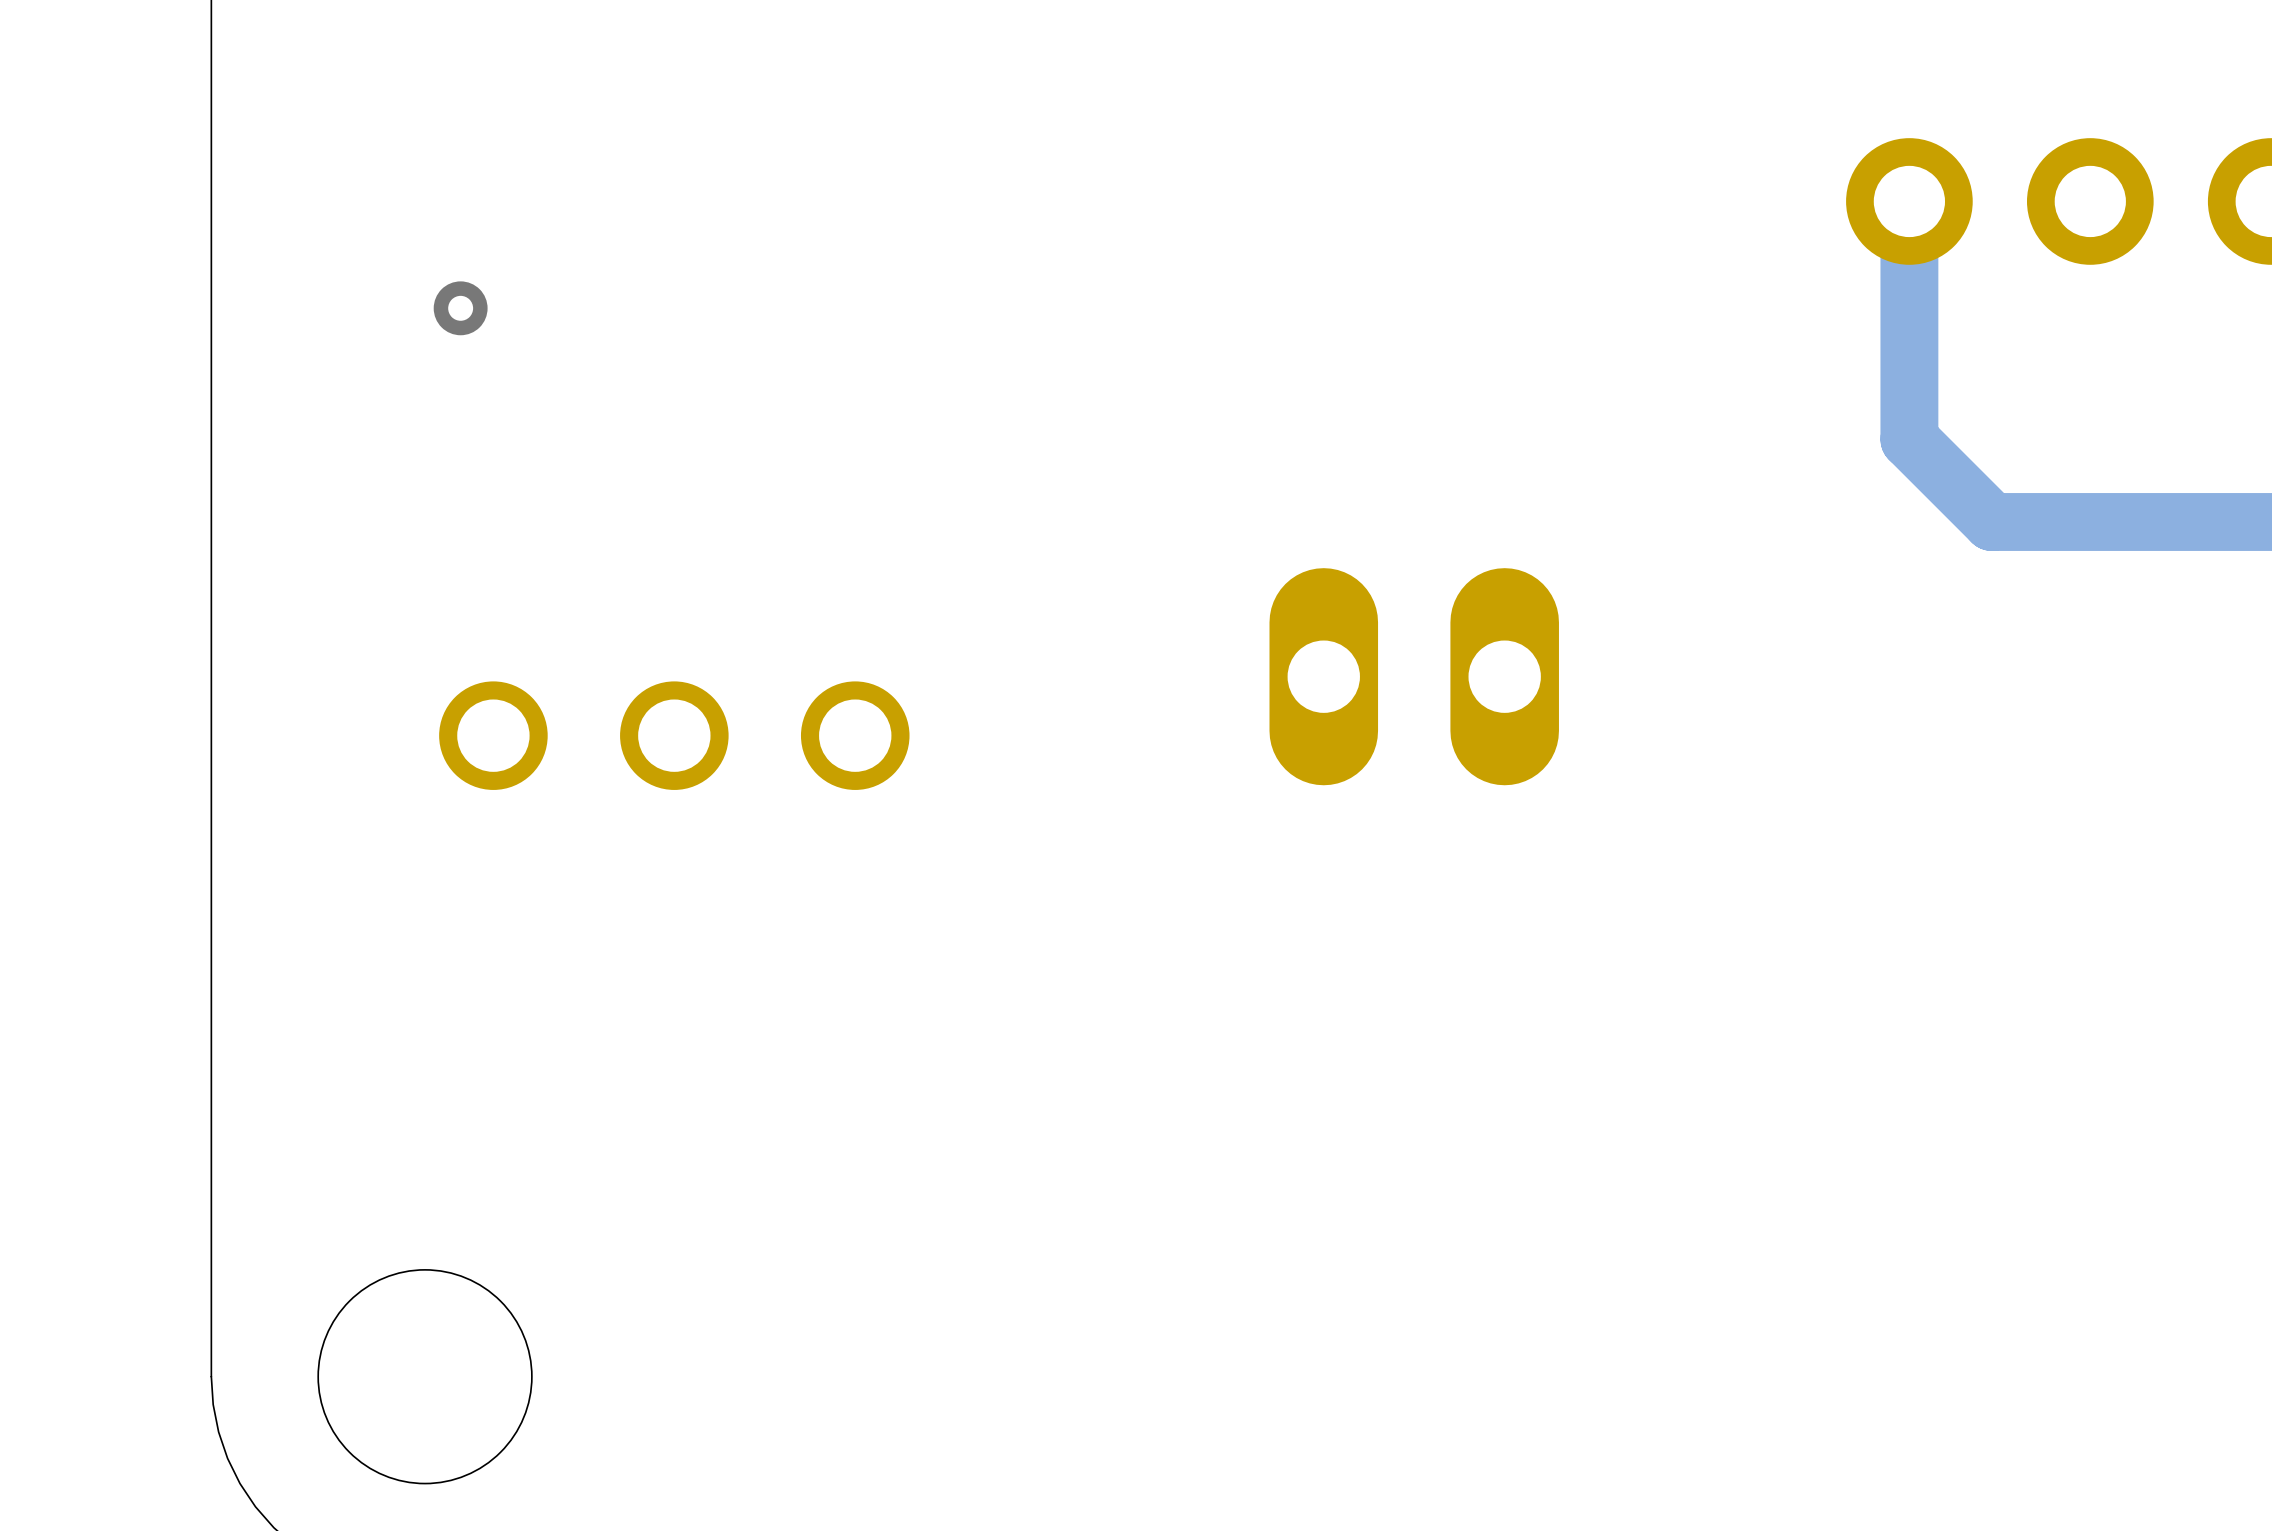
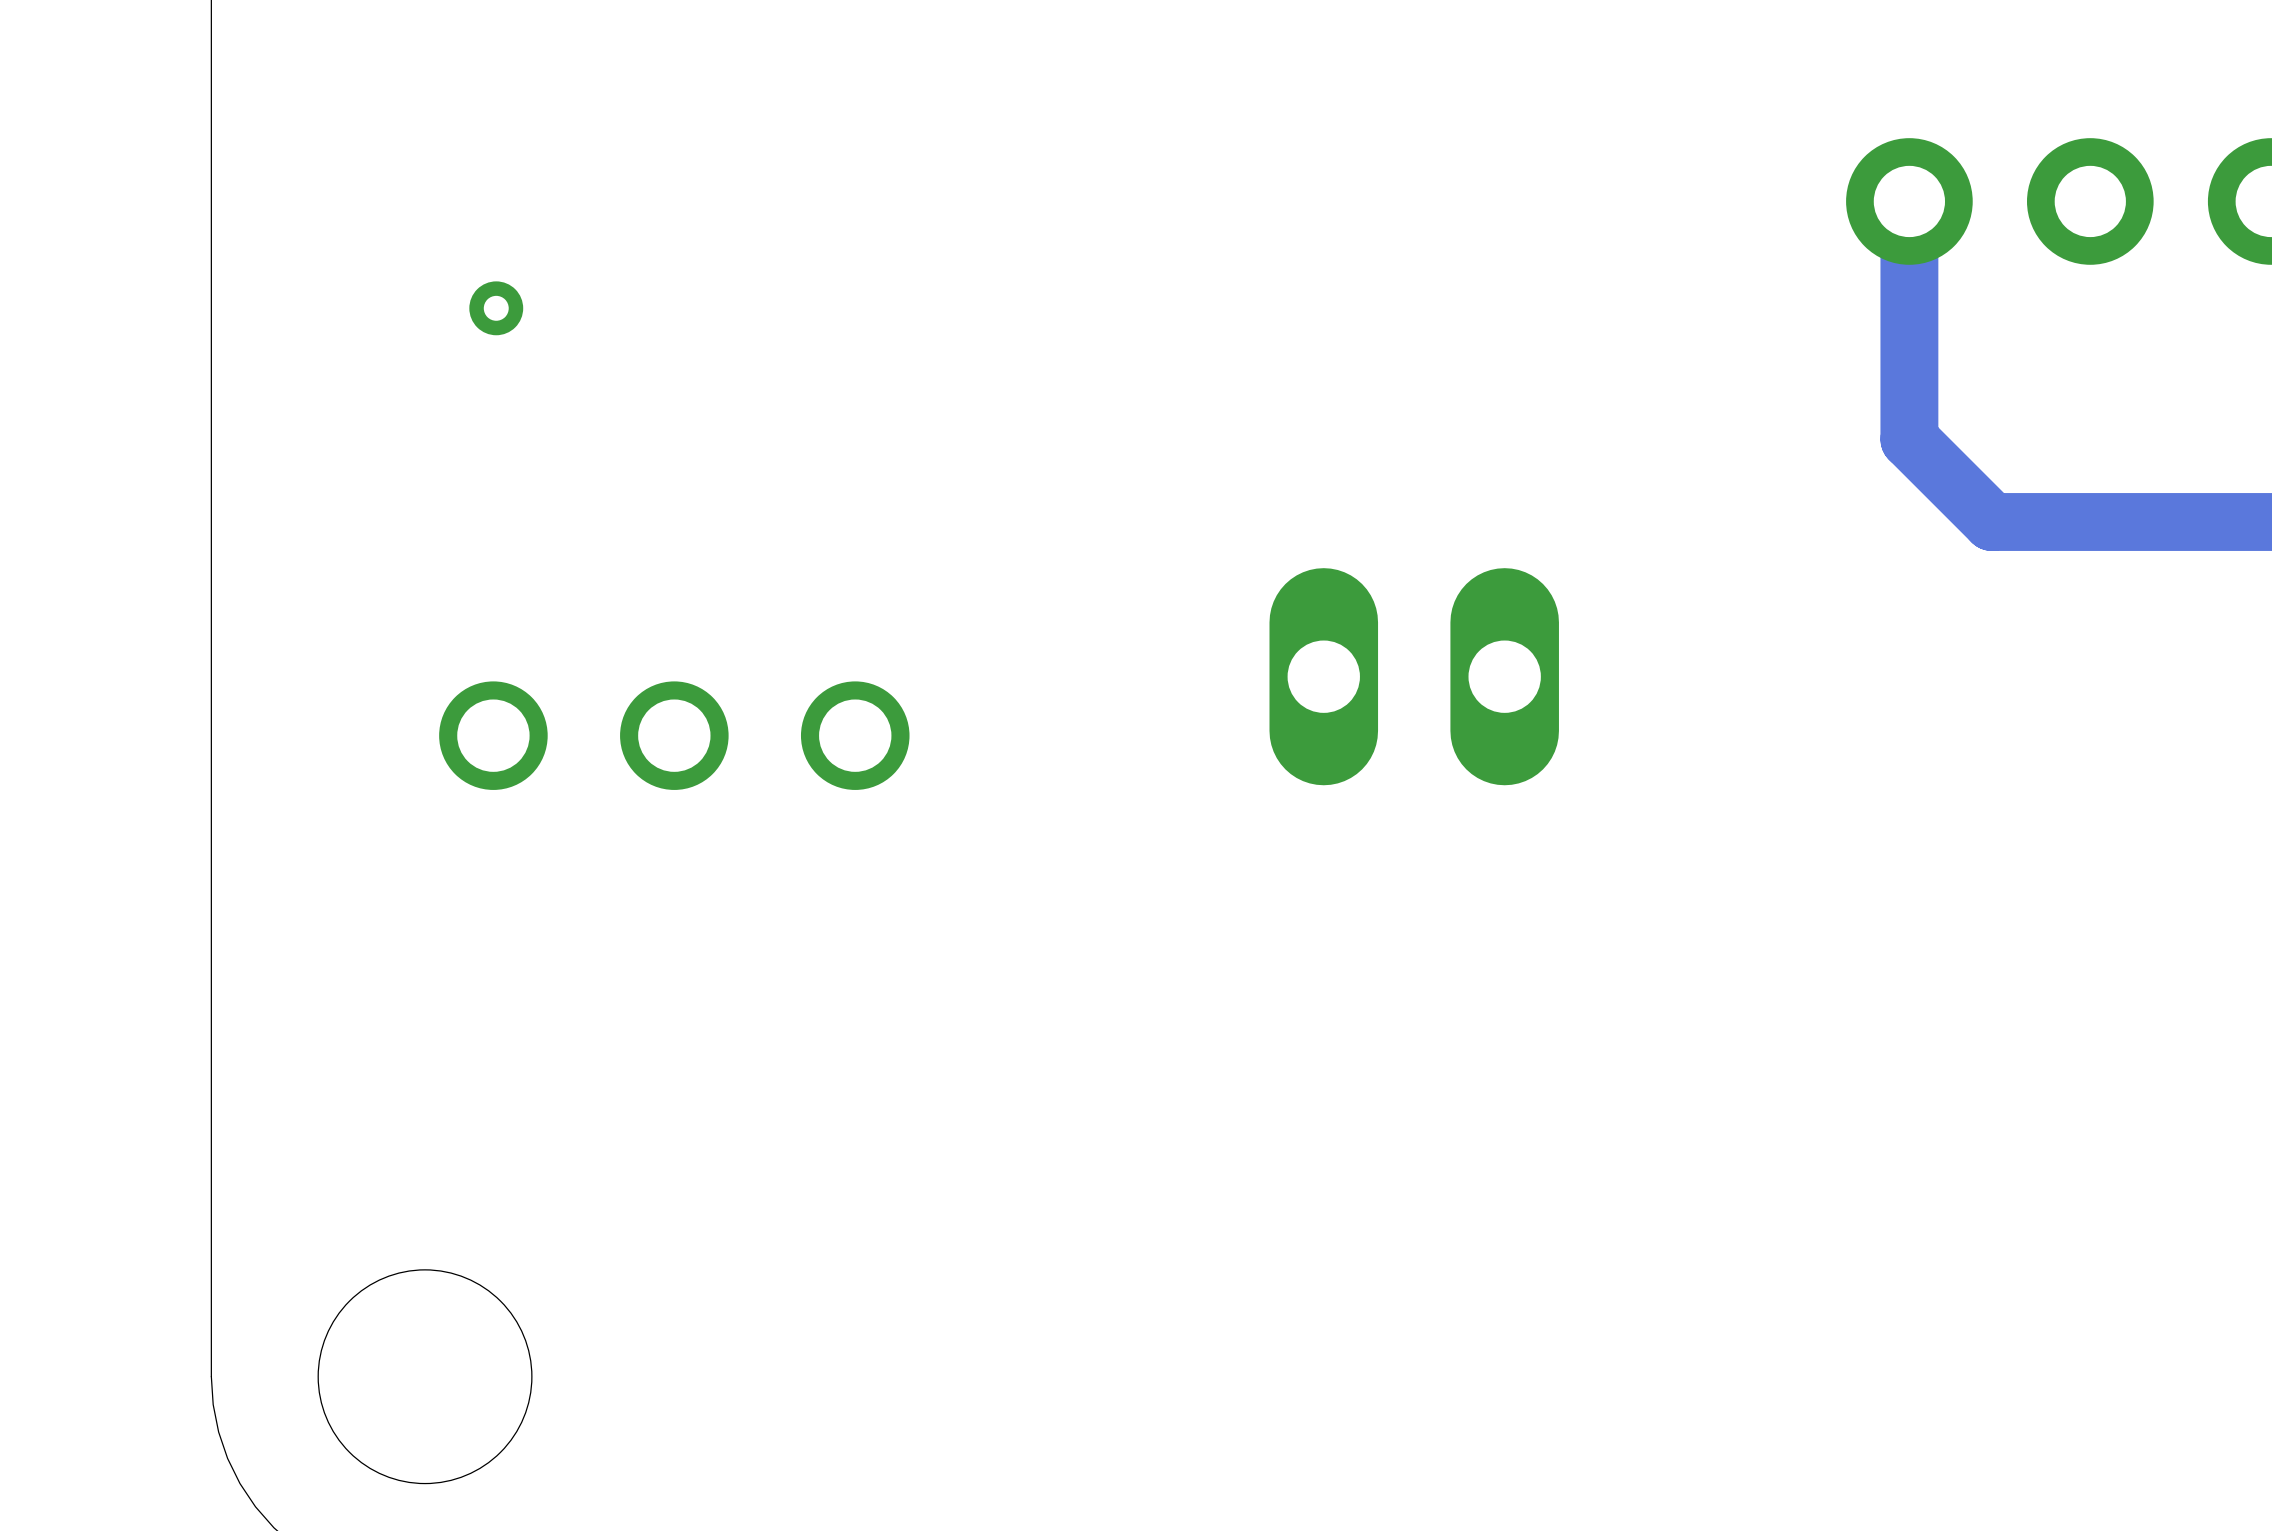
via position: (460, 308) -> (496, 308)

